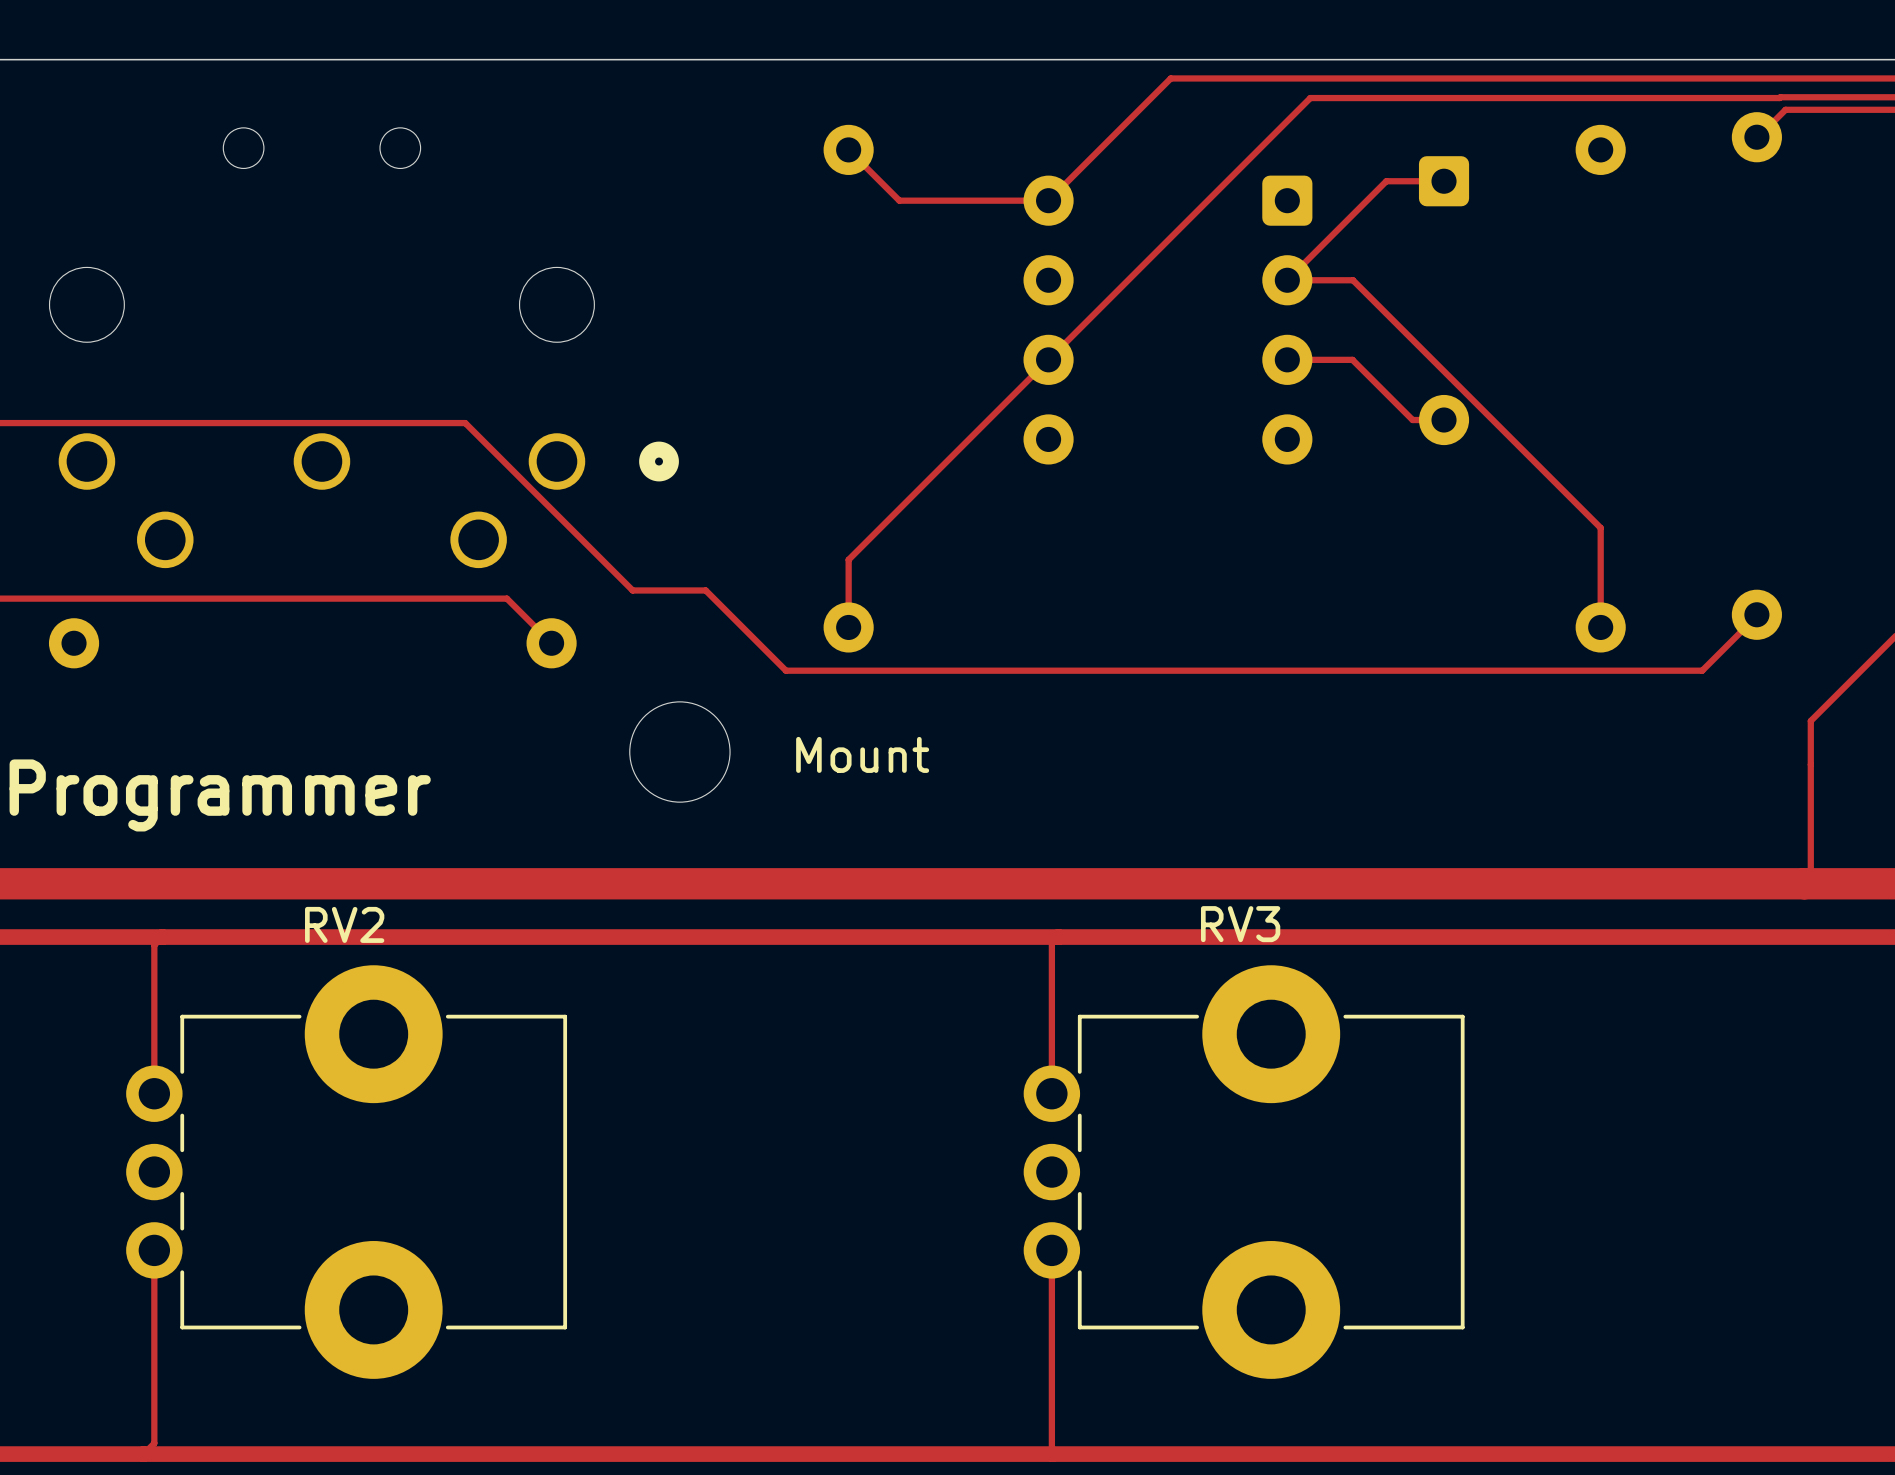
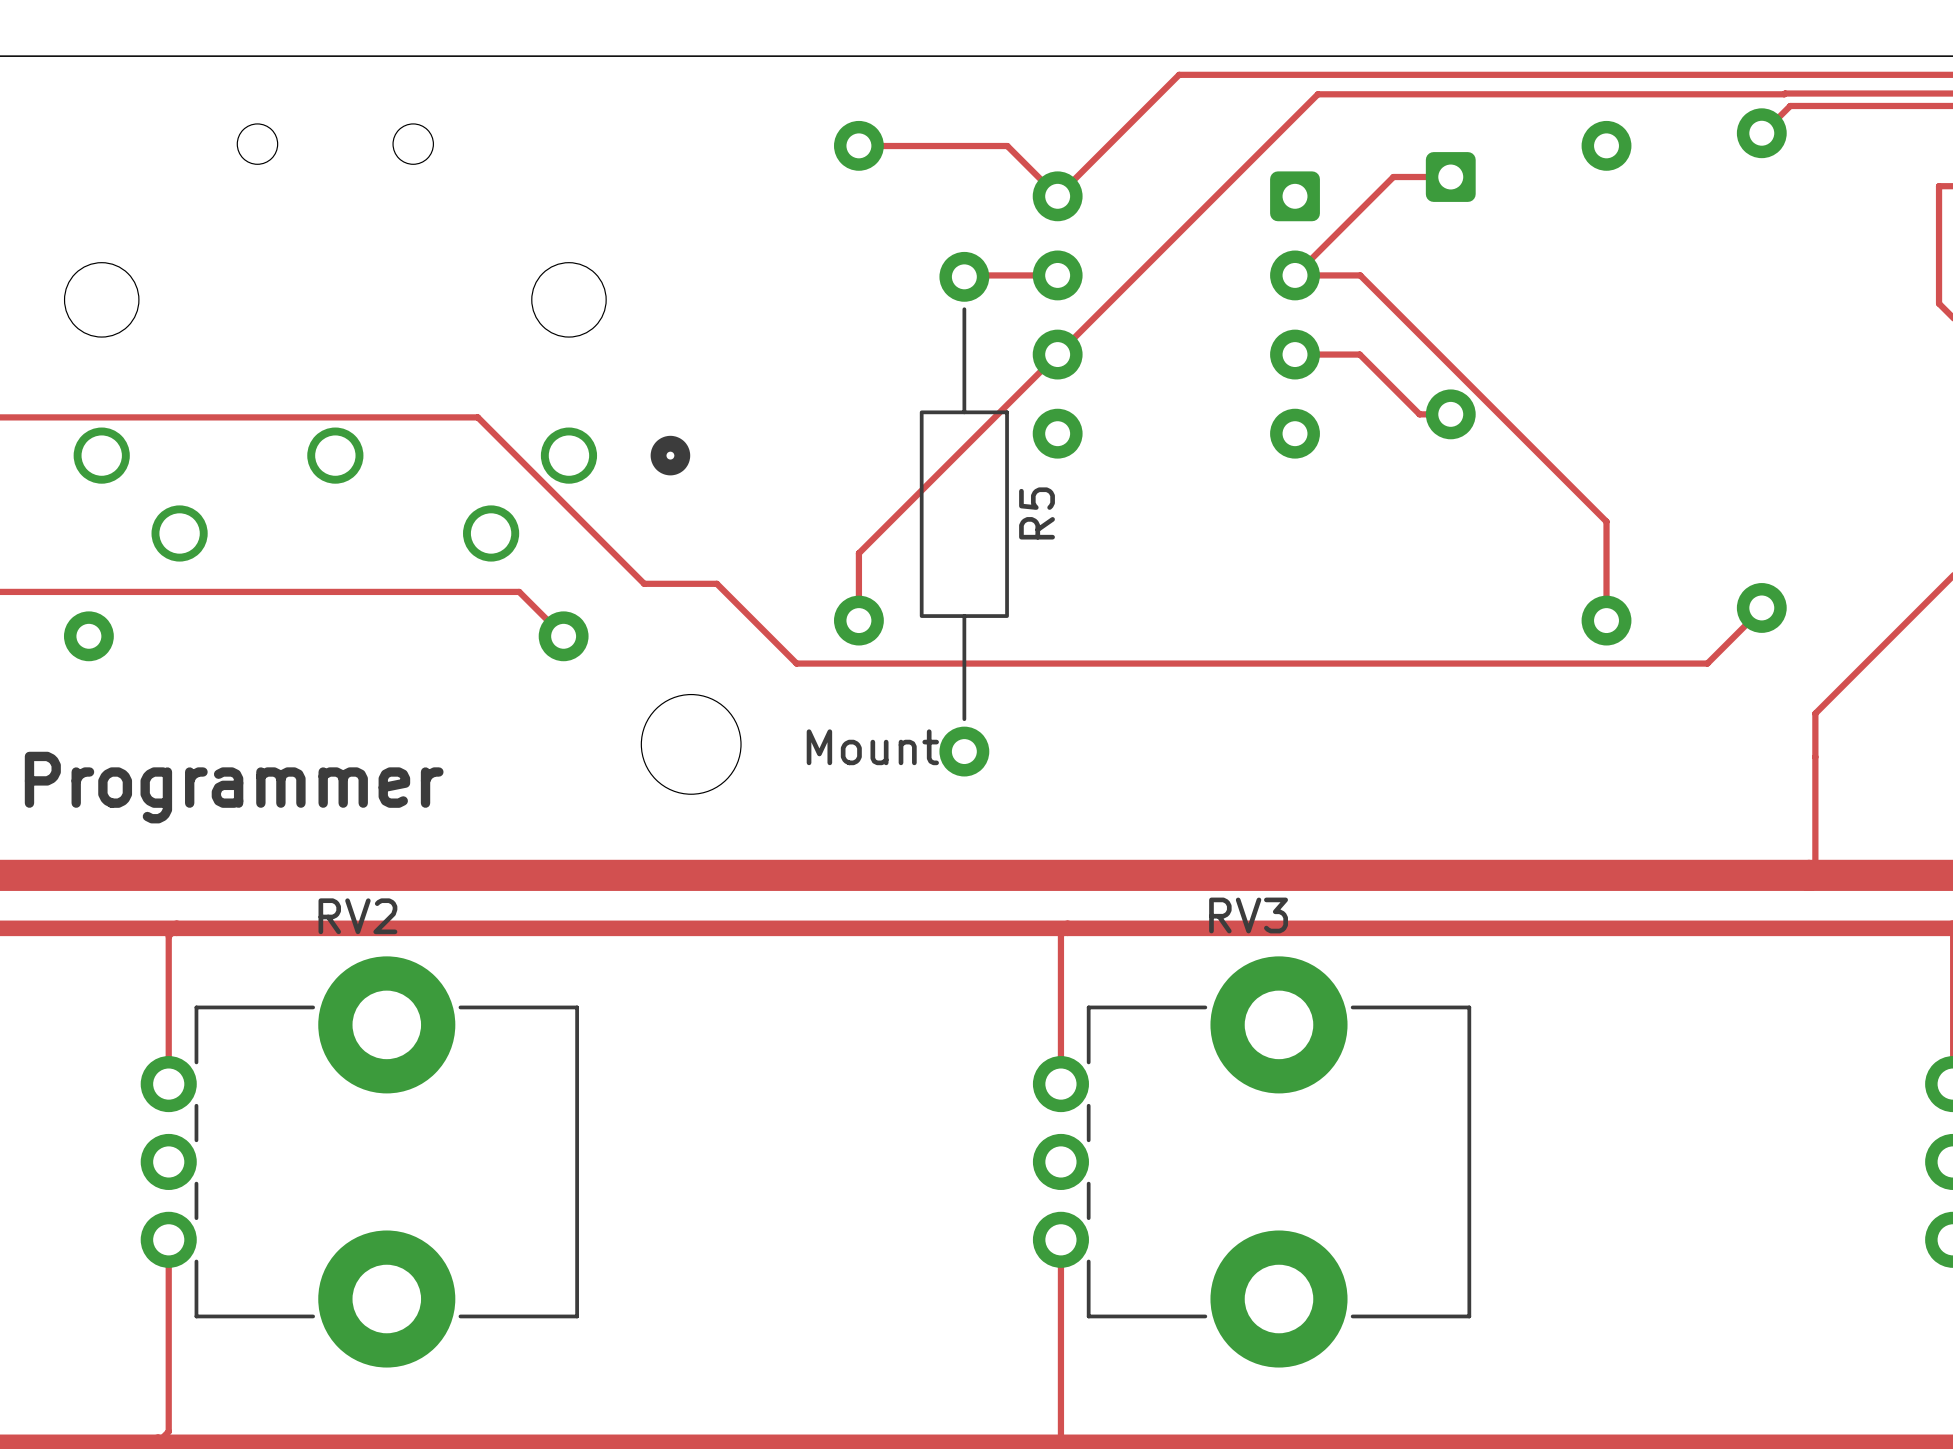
track: (848, 150) (899, 200) (1048, 200) -> (859, 146) (1007, 146) (1057, 196)
track: none -> (1057, 275) (964, 276)
R5: none -> (964, 514)

